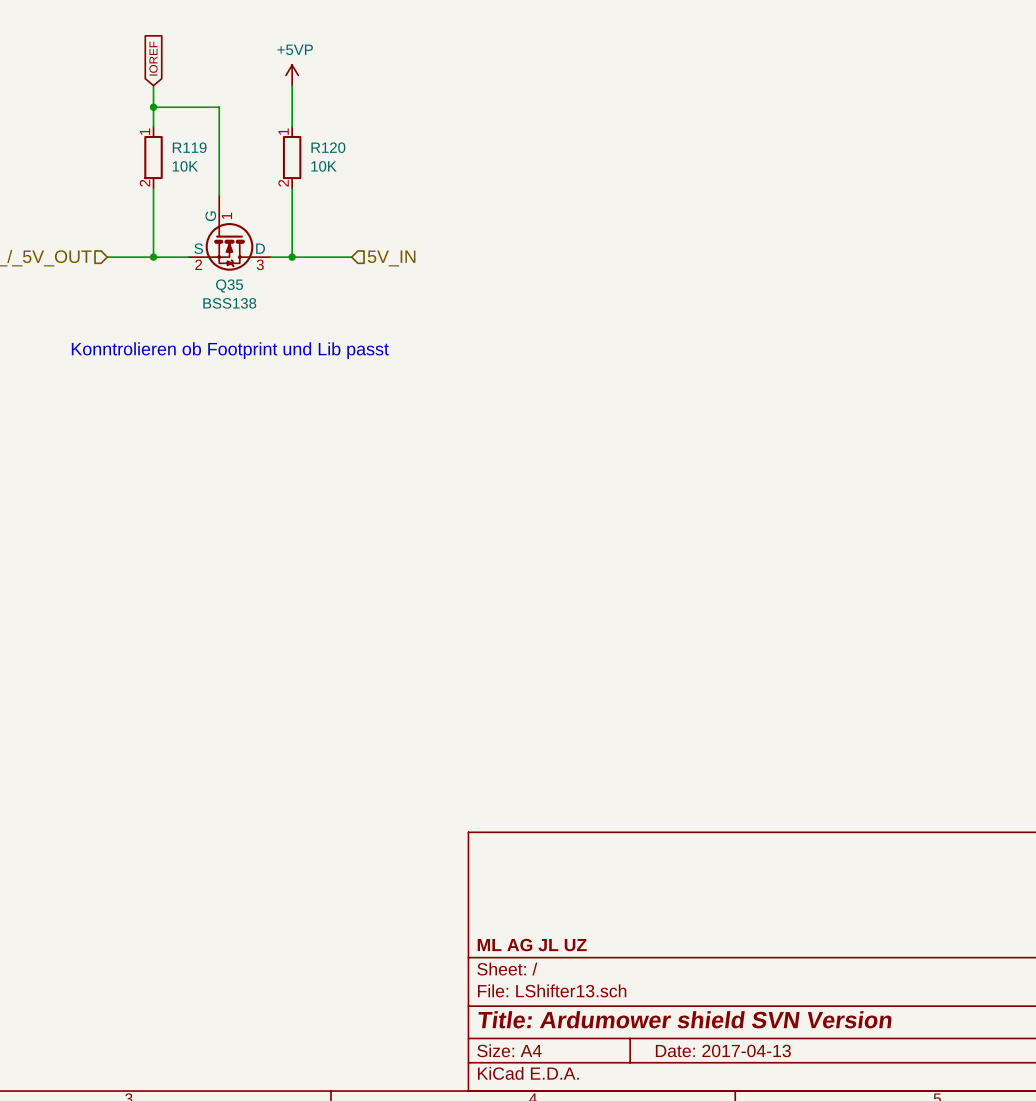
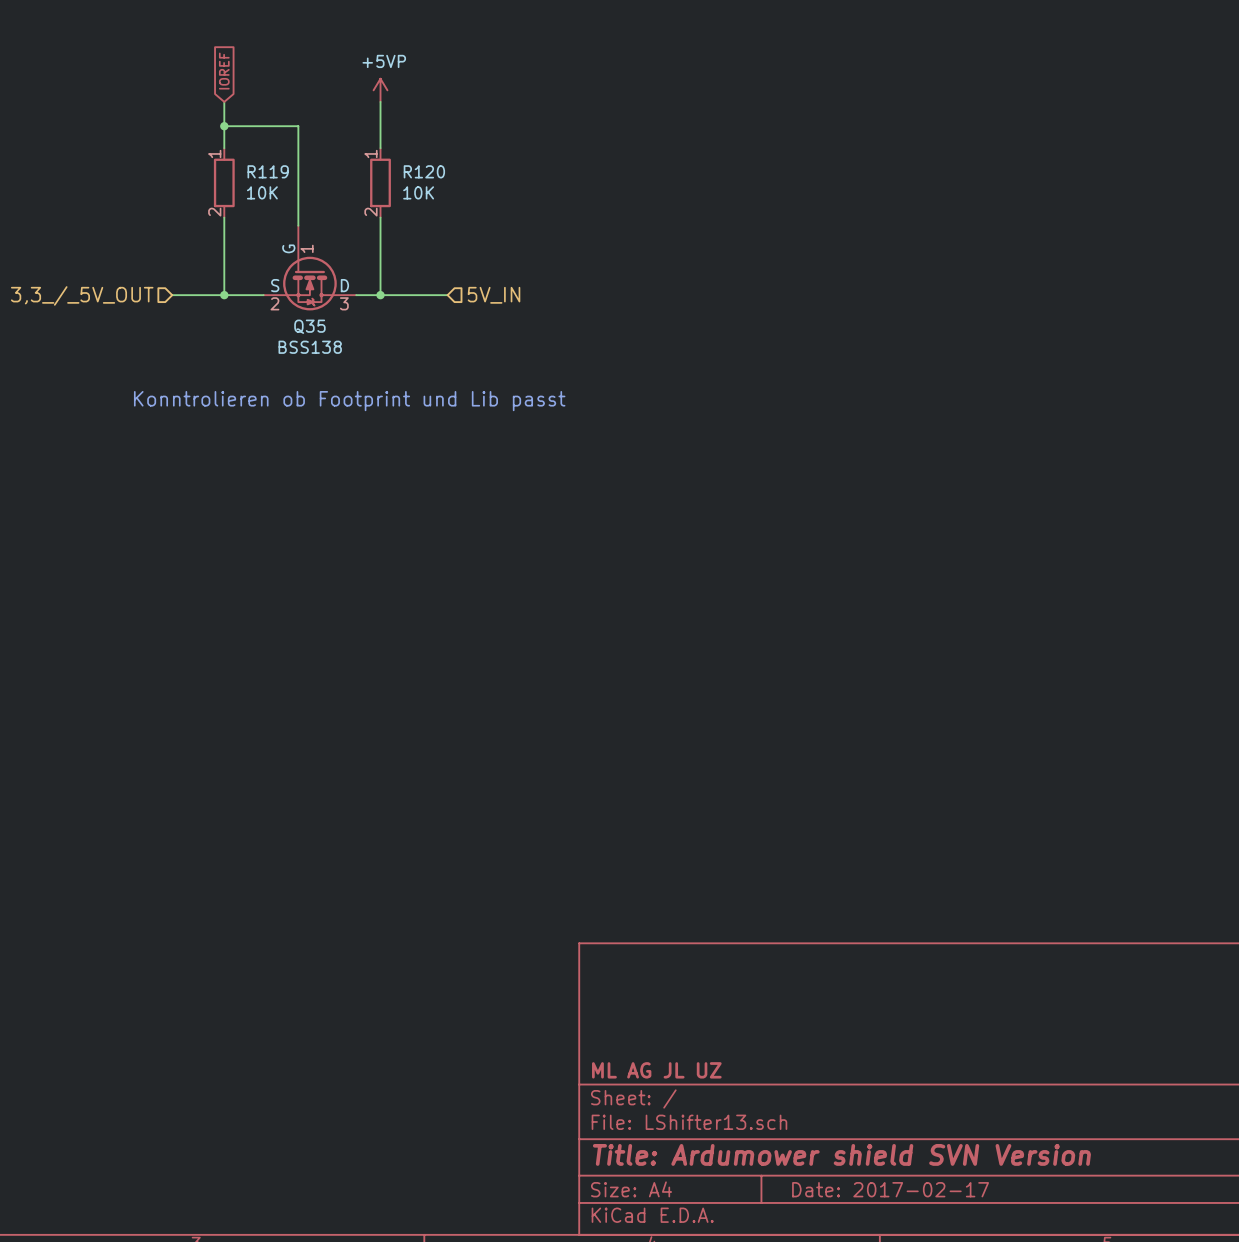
title block: Date: 2017-04-13 (723, 1050) -> Date: 2017-02-17 (890, 1189)

